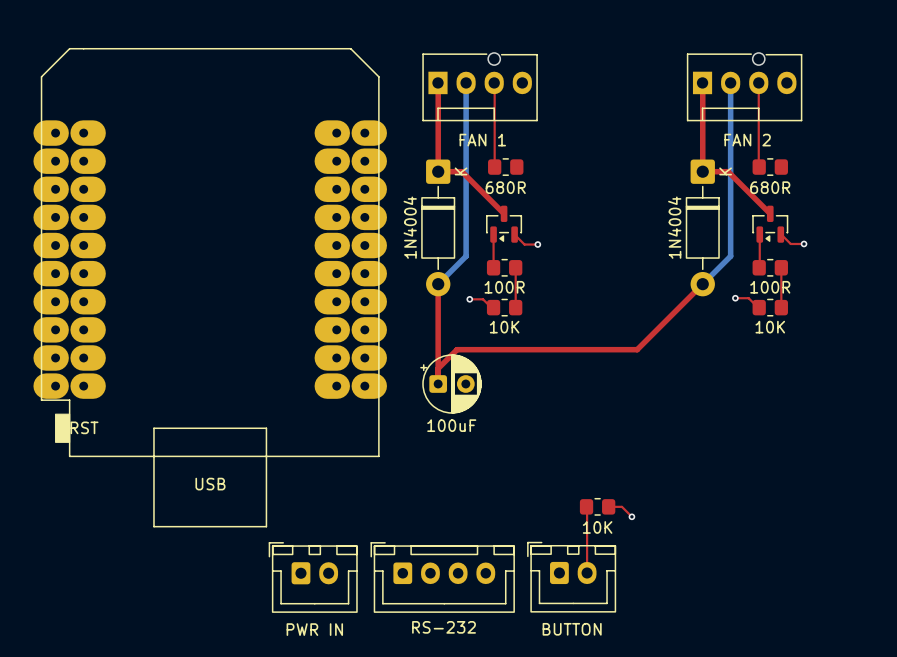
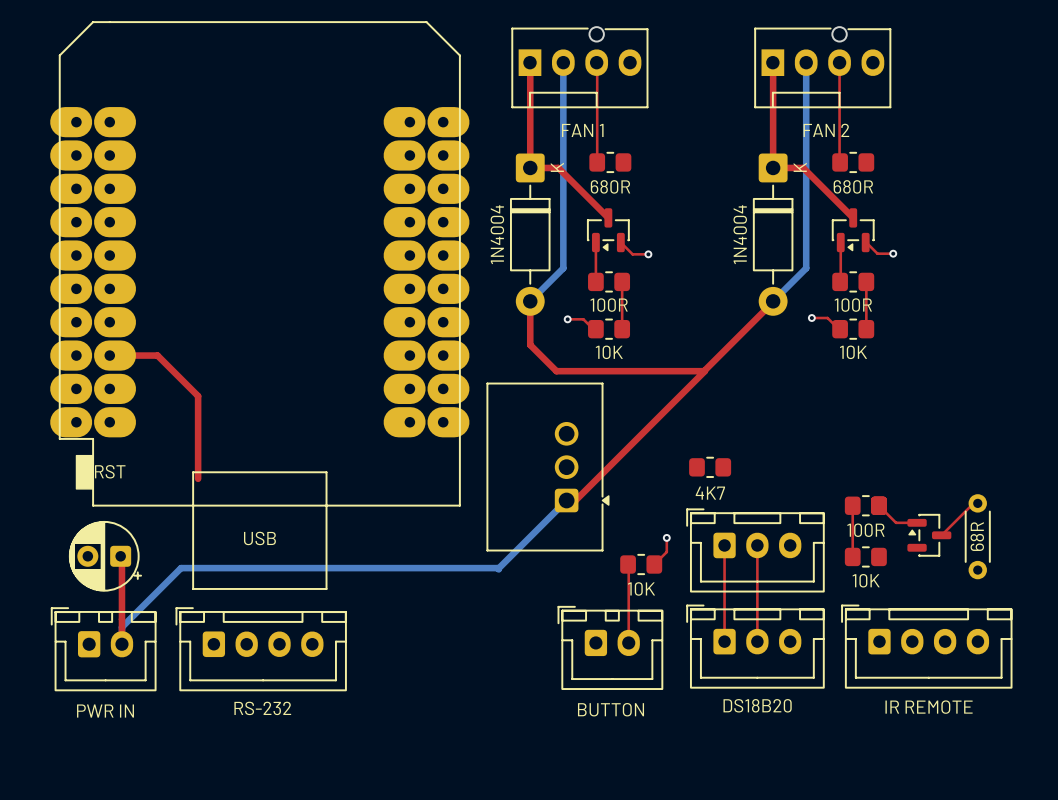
top track: (702, 82) (702, 171) (728, 171) (770, 213) -> (772, 62) (773, 167) (803, 167) (853, 217)
bottom track: (730, 82) (730, 256) (702, 284) -> (806, 62) (806, 268) (773, 301)
top track: (758, 82) (759, 167) -> (839, 62) (840, 162)
part position: (744, 87) -> (822, 67)
part footprint: [685, 159, 720, 297] -> [831, 208, 875, 253]
part position: (770, 167) -> (853, 162)
part rotation: 0° (770, 224) -> 90° clockwise (929, 535)
part position: (770, 224) -> (929, 535)
part: none -> 1N4004 (773, 234)
part value: 1N4004 (674, 227) -> none
top track: (759, 234) (759, 267) -> (840, 242) (840, 281)
top track: (780, 234) (790, 243) (804, 243) -> (865, 241) (877, 253) (893, 253)
via: none -> (893, 253)
via: (804, 243) -> none
part position: (770, 267) -> (853, 281)
top track: (781, 267) (781, 307) -> (866, 281) (866, 329)
top track: (438, 284) (438, 383) -> (530, 301) (530, 345) (556, 371) (704, 371) (575, 500) (566, 500)
top track: none -> (773, 301) (704, 371)
top track: (702, 284) (637, 349) (457, 349) (438, 368) -> none
via: none -> (811, 318)
top track: (735, 298) (748, 298) (758, 308) -> (811, 318) (827, 318) (839, 329)
via: (735, 298) -> none
part position: (770, 307) -> (853, 329)
top track: none -> (109, 355) (157, 355) (198, 396) (198, 478)
part: 100uF (450, 383) -> none
part: none -> (548, 467)
part: none -> 4K7 (710, 467)
bottom track: none -> (566, 500) (498, 568)
top track: none -> (973, 503) (941, 535)
top track: none -> (852, 505) (852, 556)
part: none -> 100R (865, 505)
top track: none -> (878, 505) (896, 522) (917, 522)
part: none -> (878, 505)
part: none -> 68R (977, 536)
top track: none -> (666, 537) (666, 552) (654, 564)
via: none -> (666, 537)
top track: none -> (724, 545) (724, 641)
top track: none -> (757, 545) (757, 641)
part: none -> (755, 550)
part: none -> (105, 556)
top track: none -> (120, 556) (121, 644)
part: none -> 10K (865, 556)
part: none -> 10K (641, 564)
top track: (586, 506) (587, 572) -> (628, 564) (628, 642)
part: 10K (597, 506) -> none
top track: (608, 506) (621, 506) (631, 516) -> none
bottom track: none -> (498, 569) (181, 568) (121, 627) (121, 644)
via: (631, 516) -> none
part: none -> DS18B20 (755, 646)
part: none -> IR REMOTE (926, 646)
part position: (313, 577) -> (103, 649)
part position: (442, 577) -> (261, 649)
part position: (571, 577) -> (610, 647)

